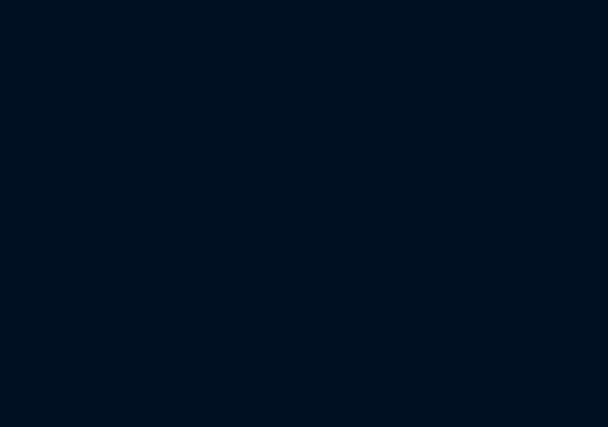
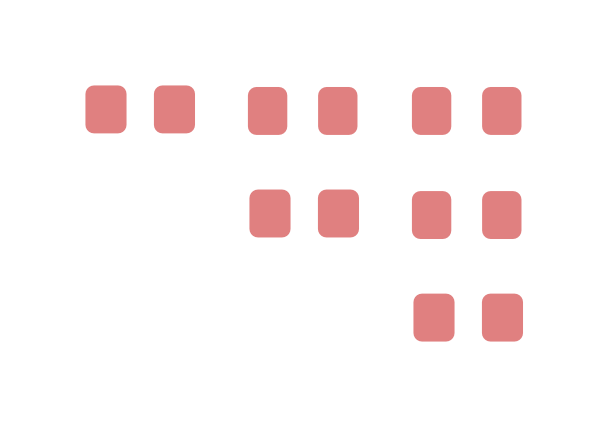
part: none -> (140, 109)
part: none -> (302, 110)
part: none -> (466, 110)
part: none -> (304, 213)
part: none -> (466, 215)
part: none -> (468, 317)

